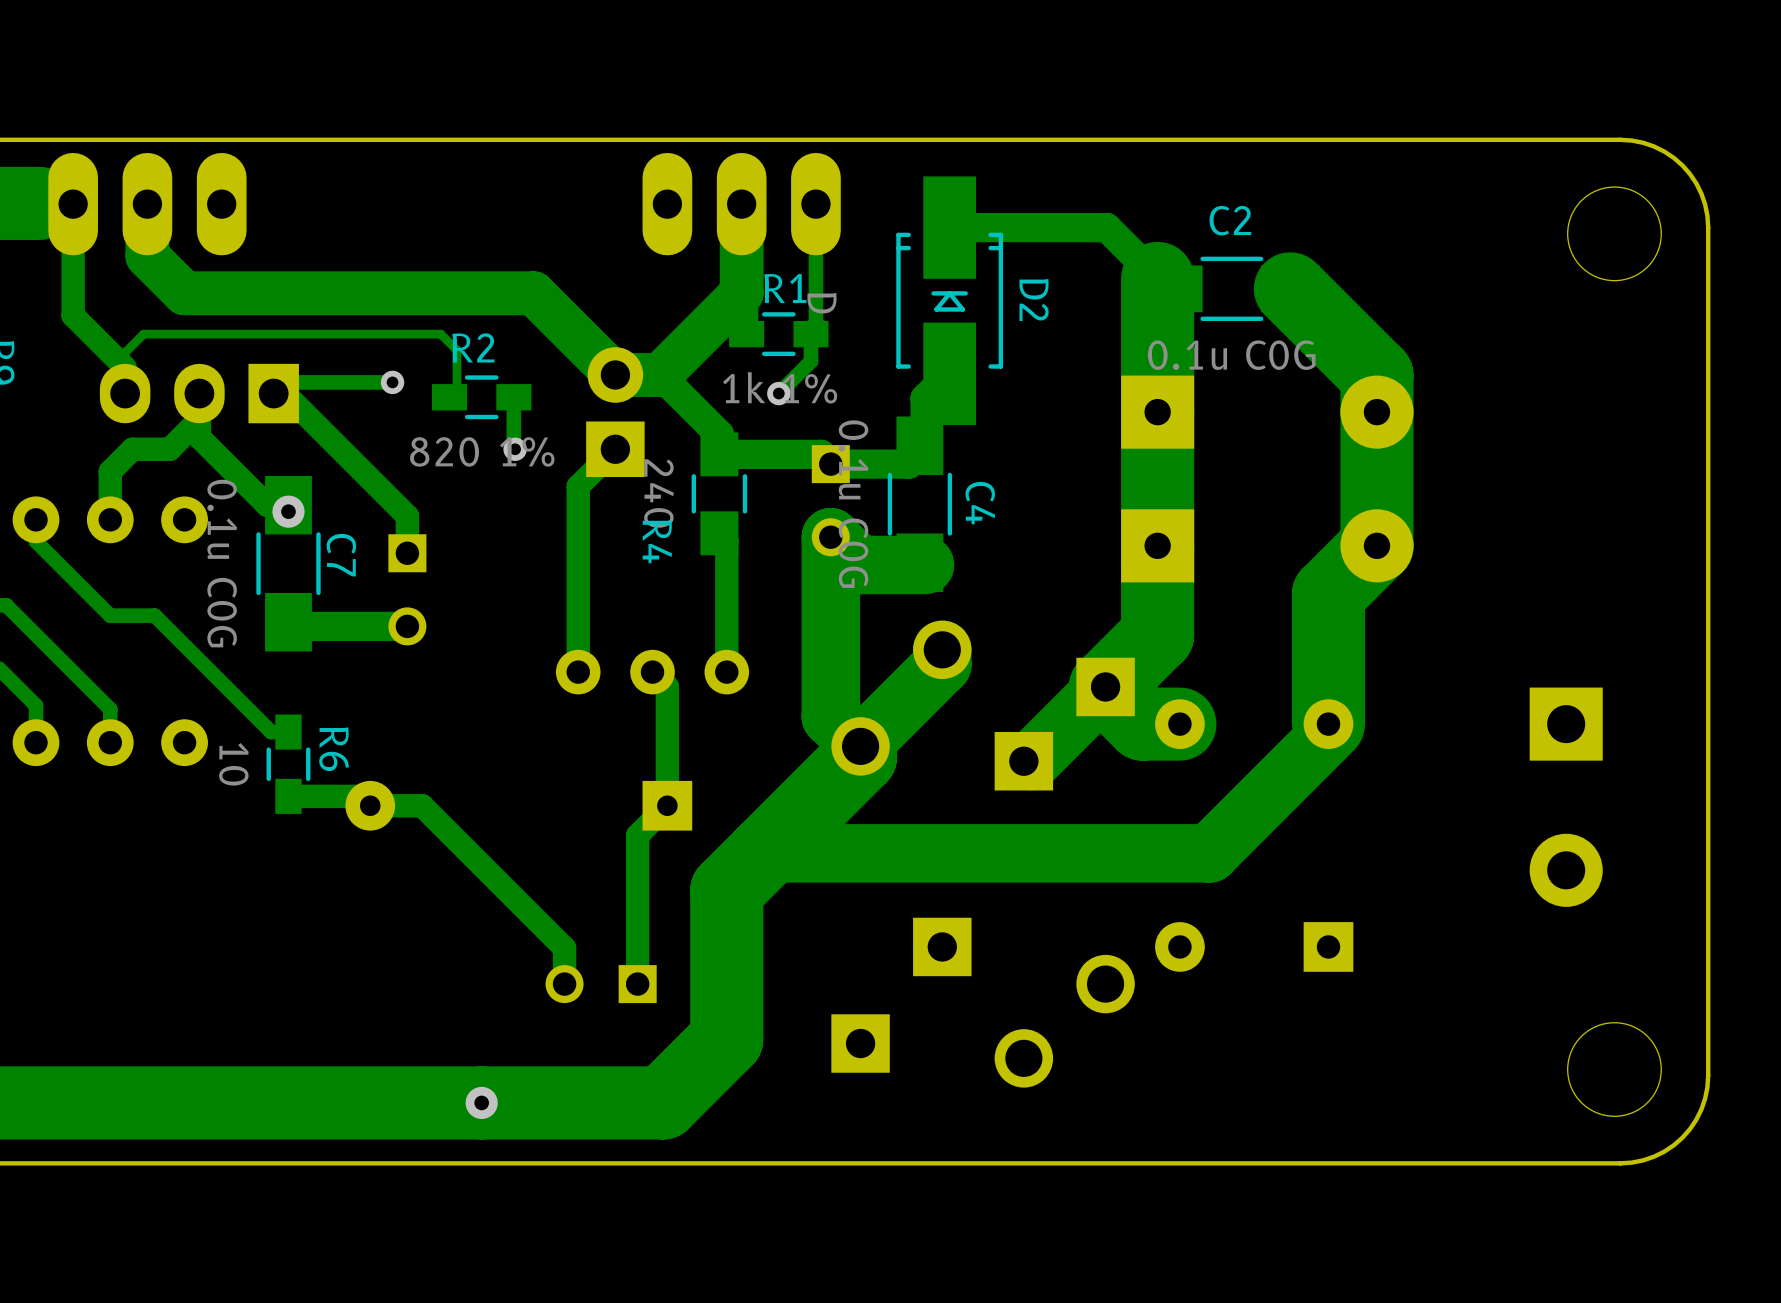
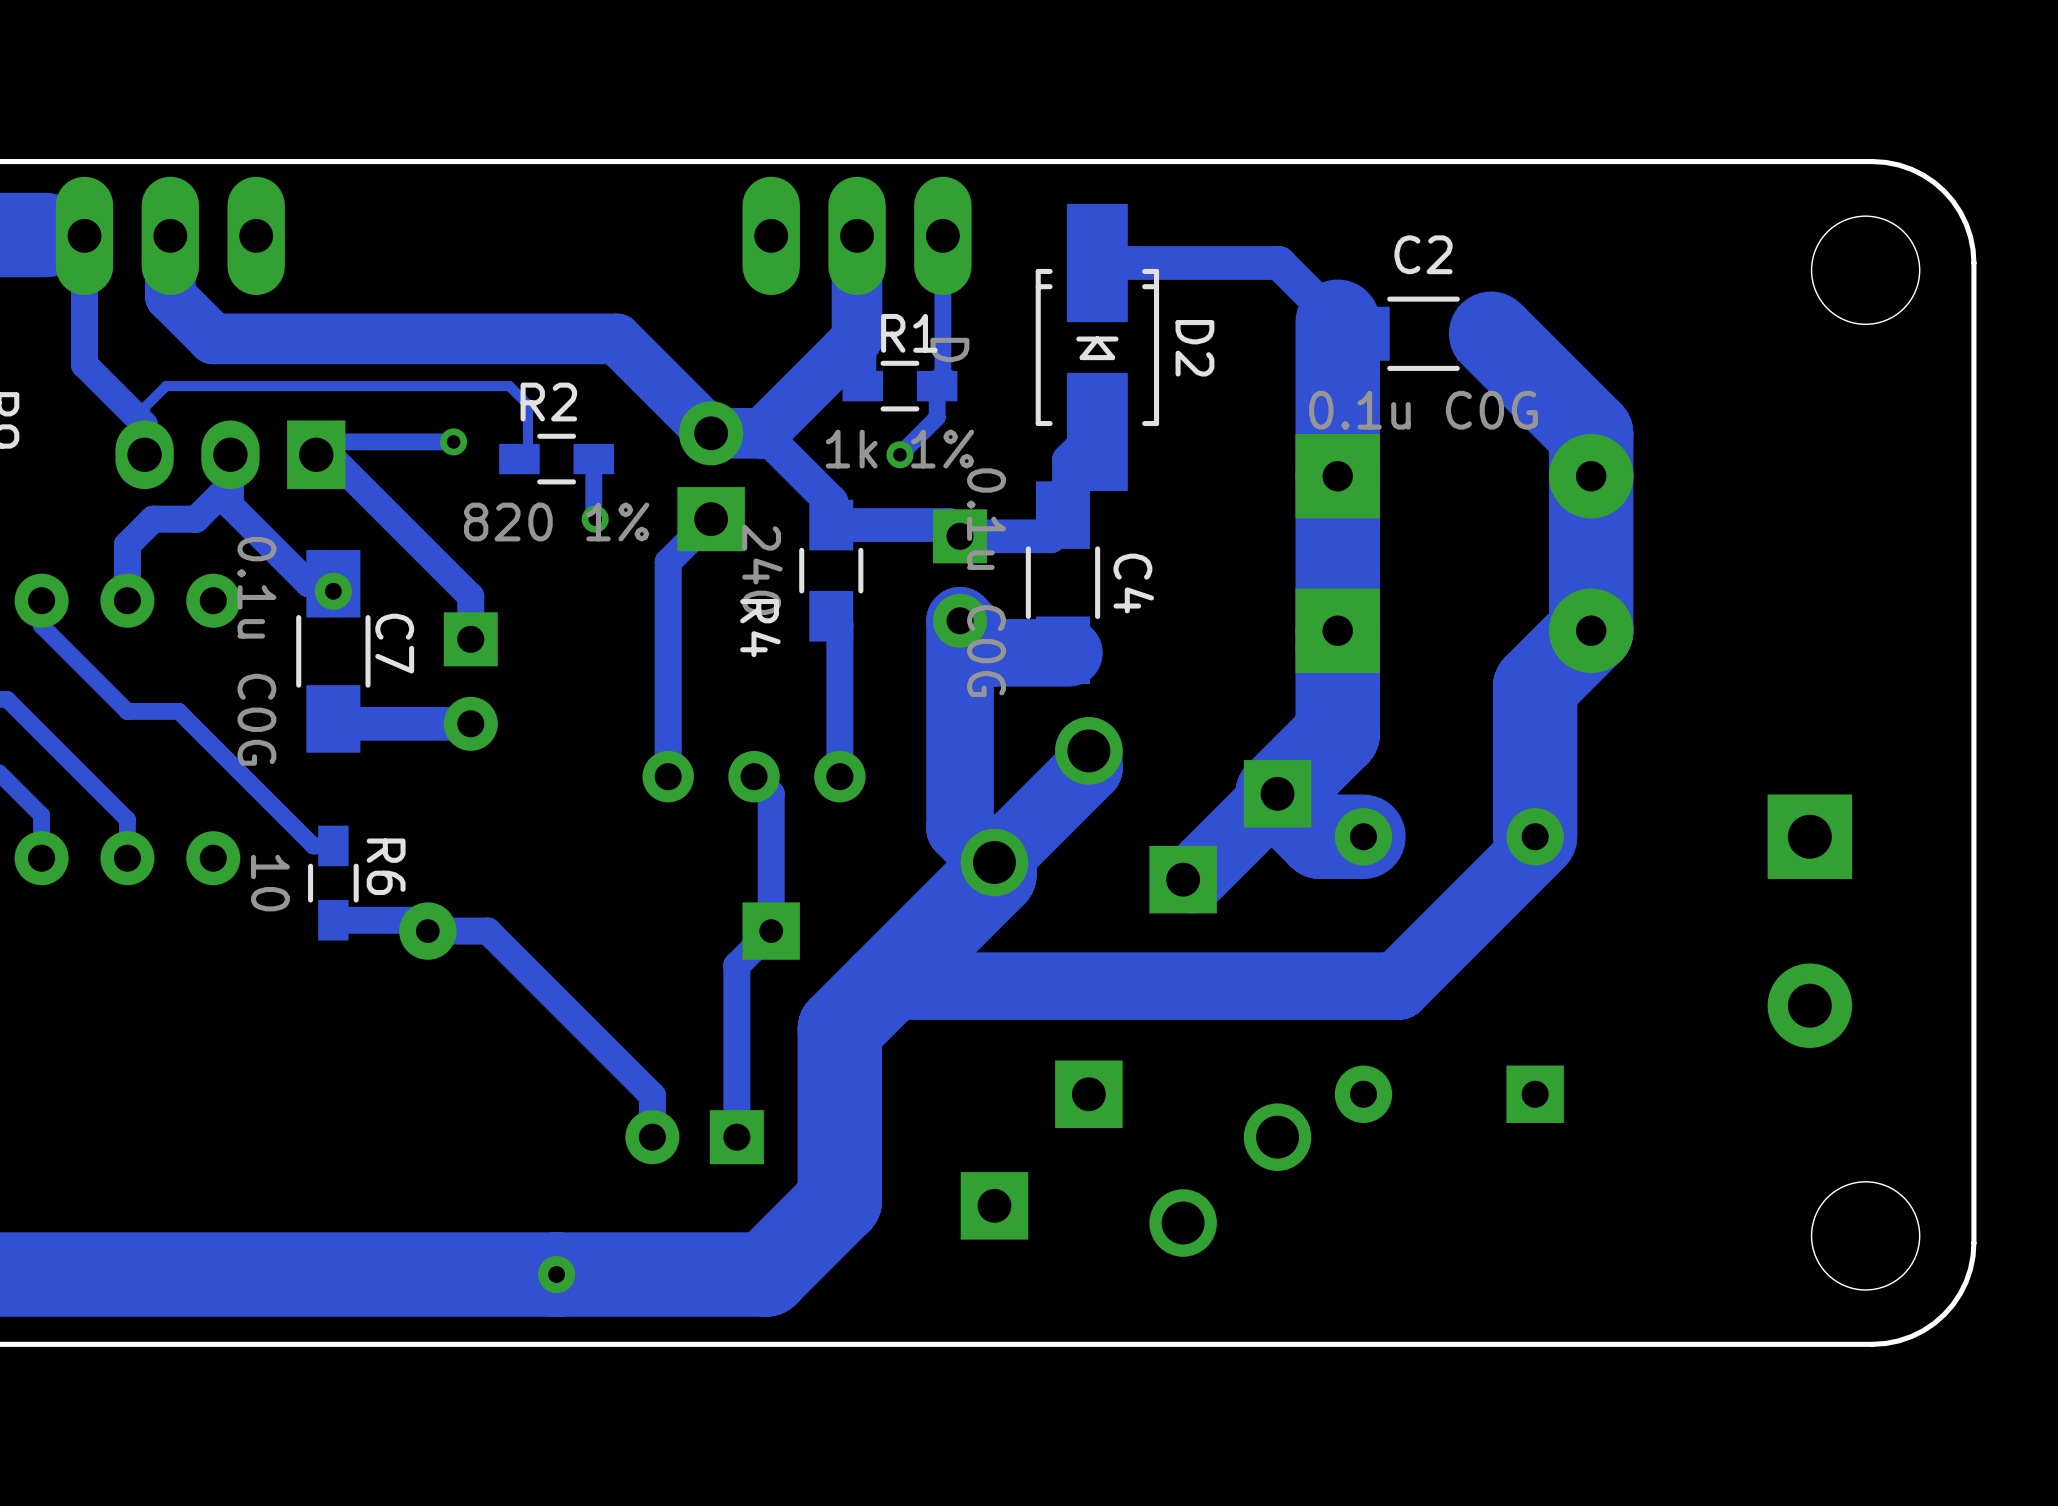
part footprint: [811, 445, 850, 557] -> [933, 509, 988, 648]
part footprint: [388, 534, 427, 646] -> [443, 612, 498, 751]
part footprint: [545, 965, 657, 1004] -> [625, 1110, 764, 1165]

